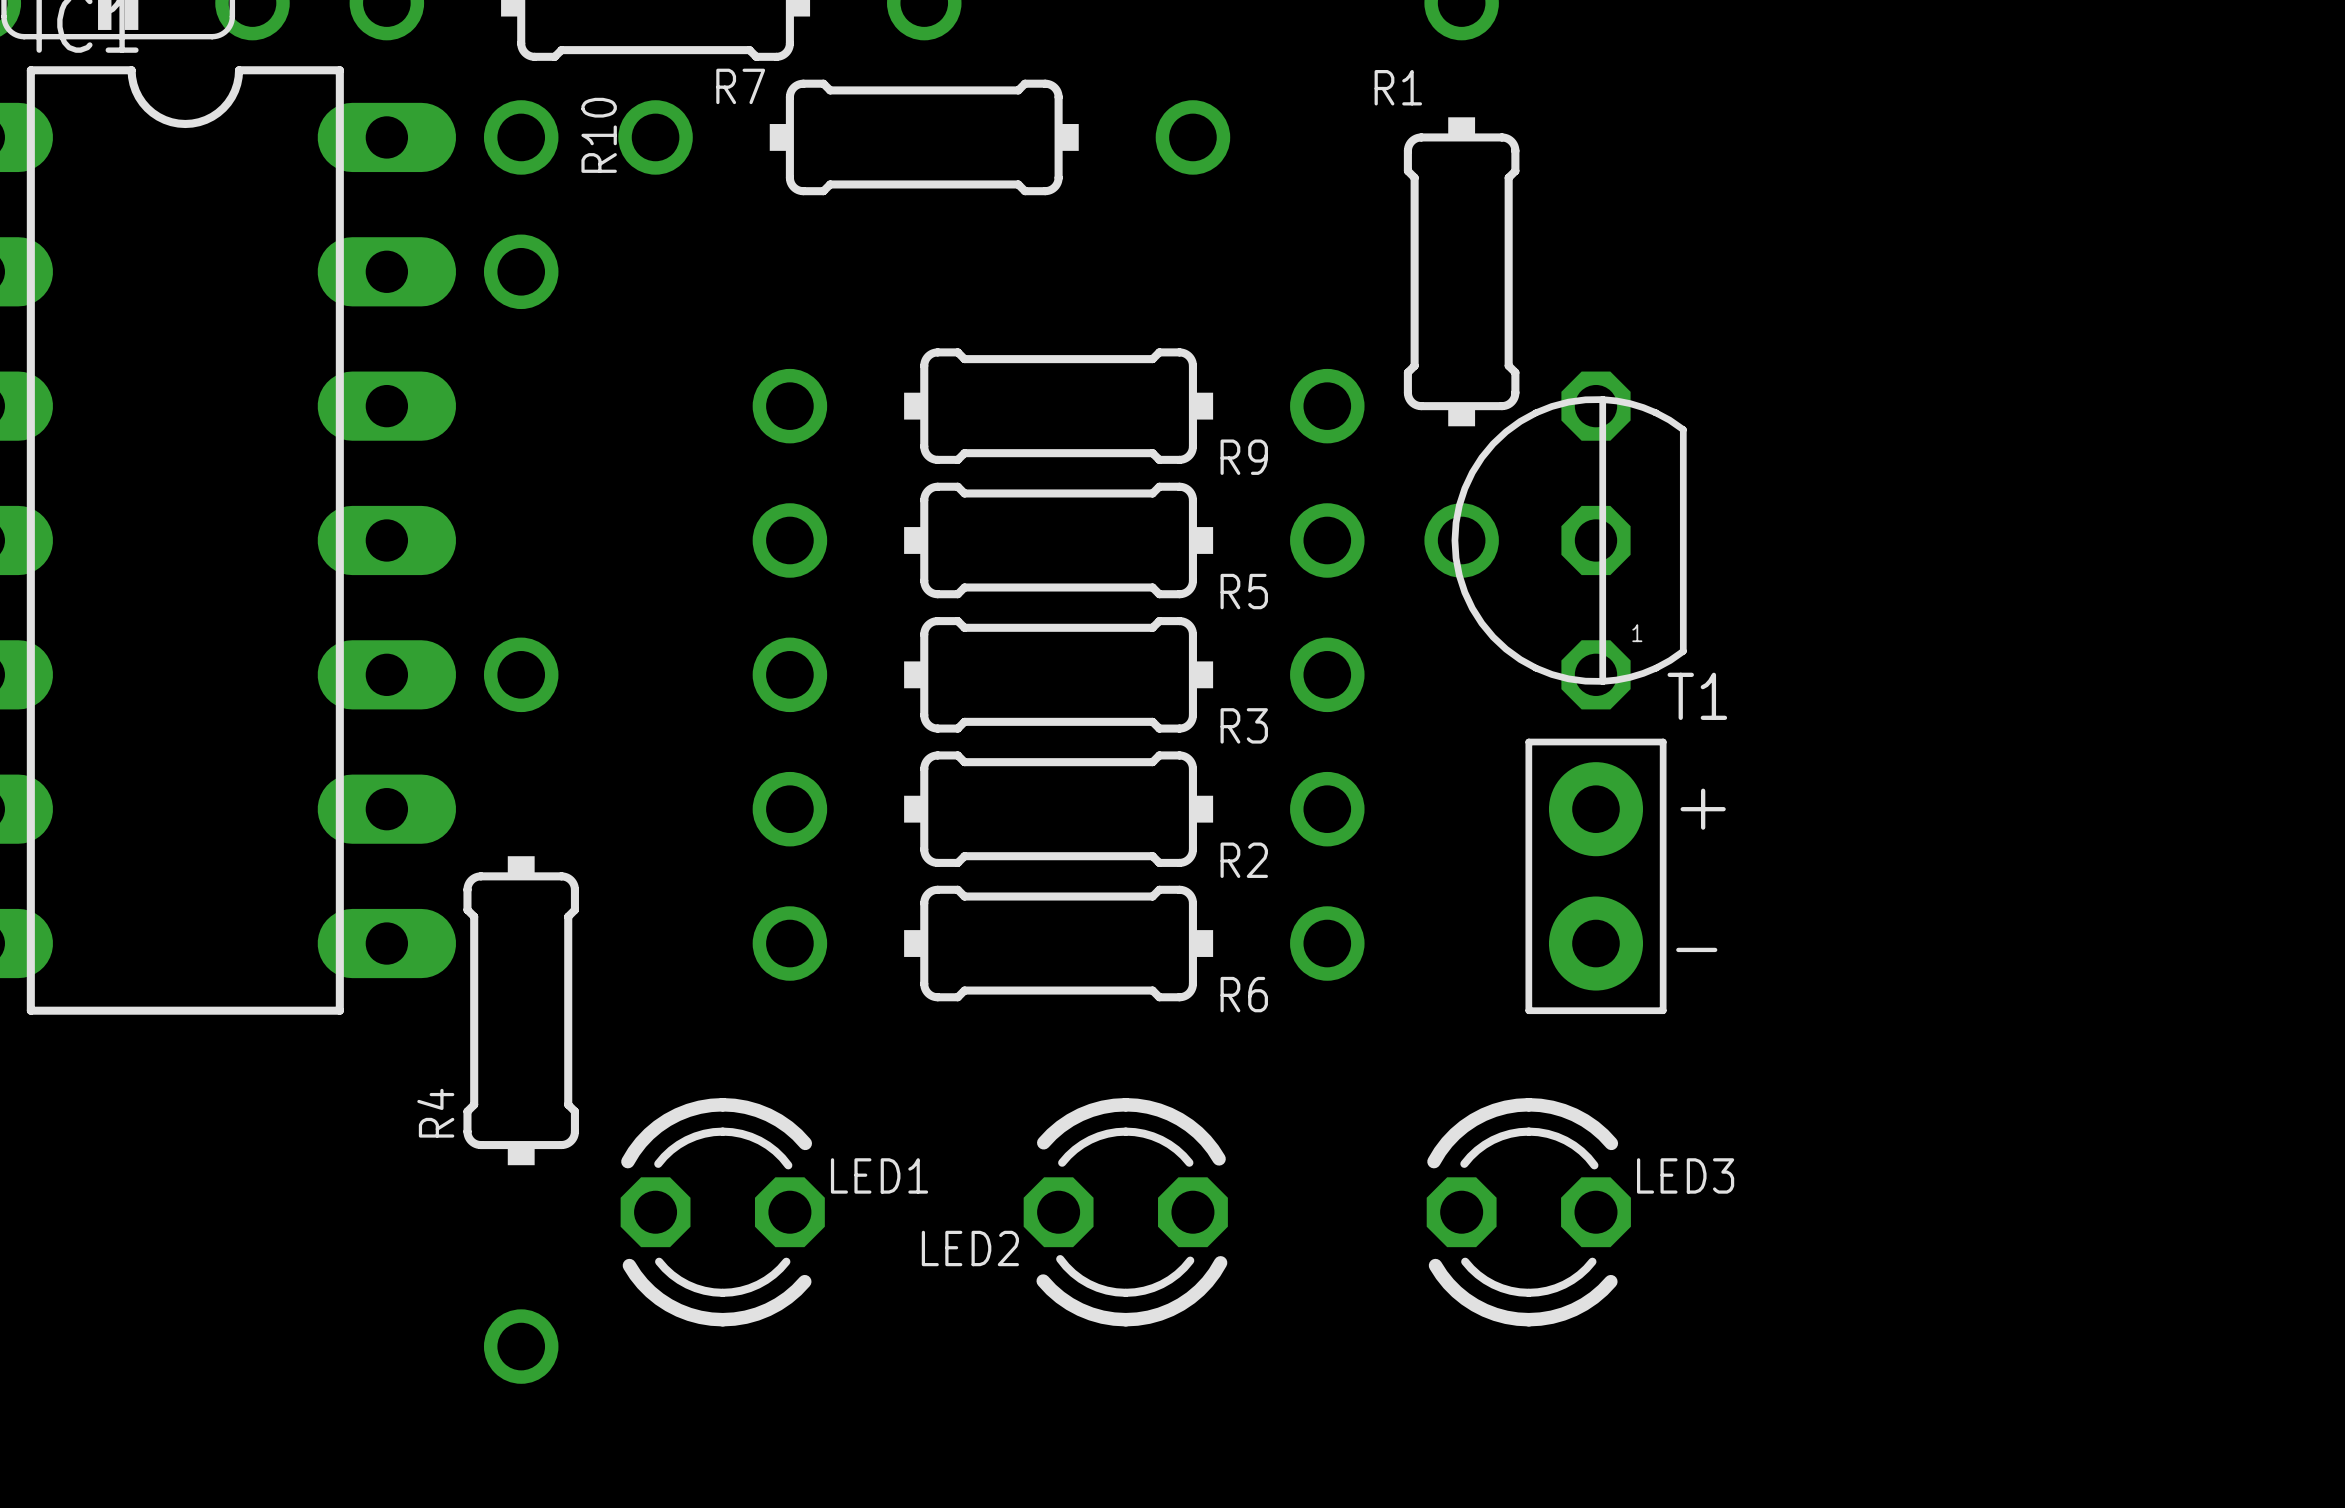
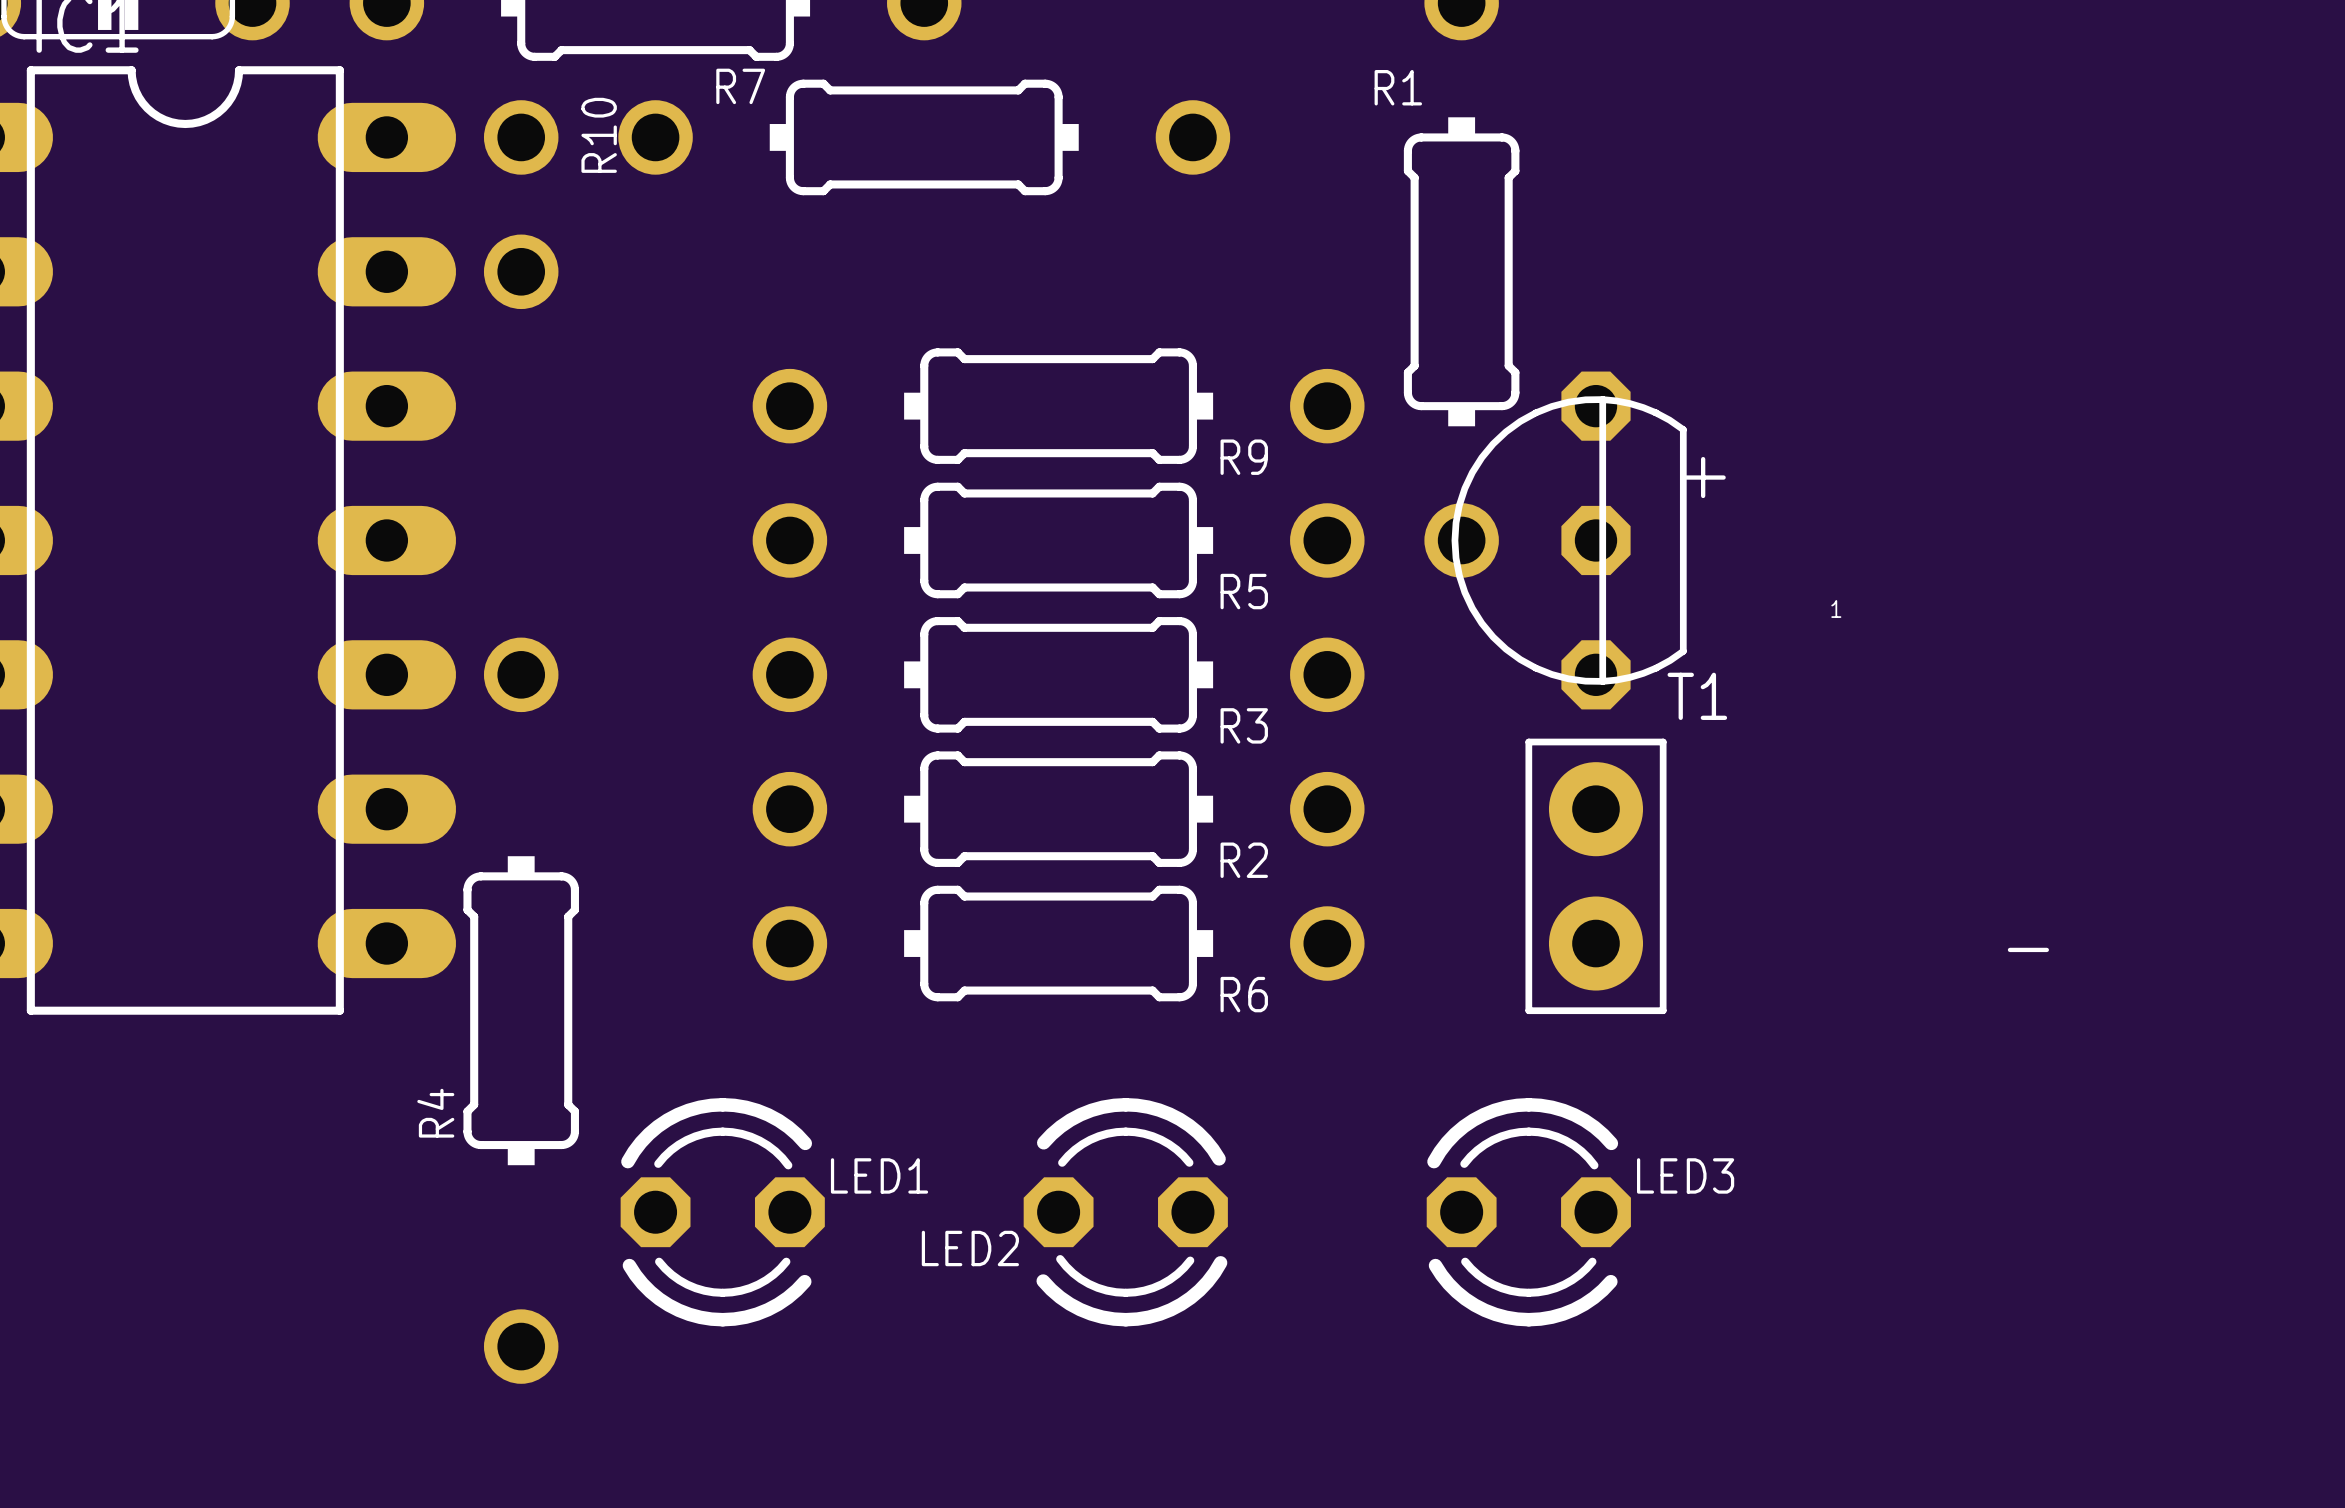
T1 text: none -> 1 (1836, 609)
T1 text: 1 (1637, 633) -> none
part footprint: [1525, 738, 1667, 1015] -> [1525, 738, 1667, 1015]

